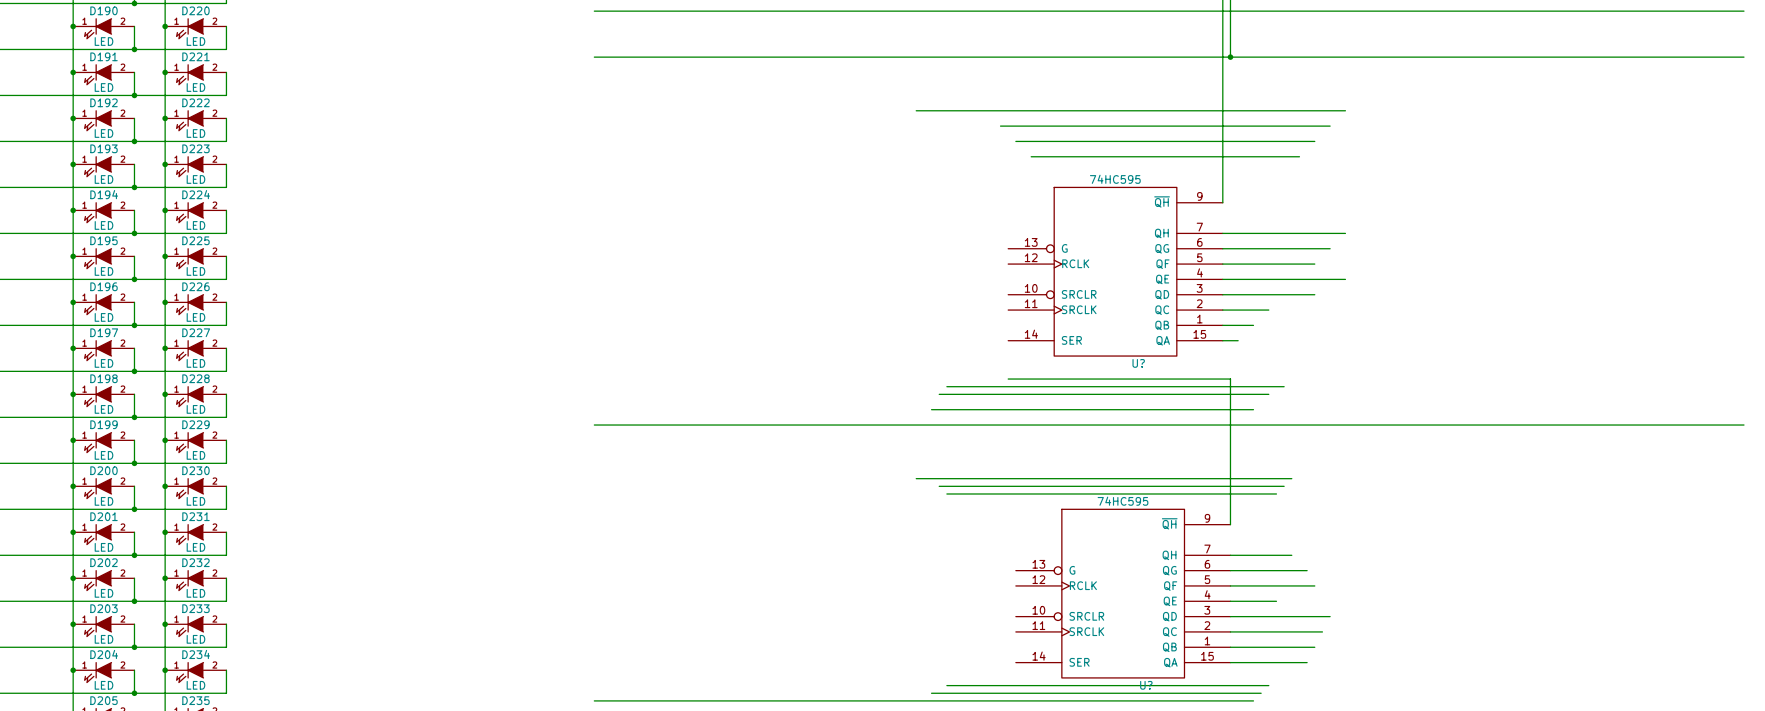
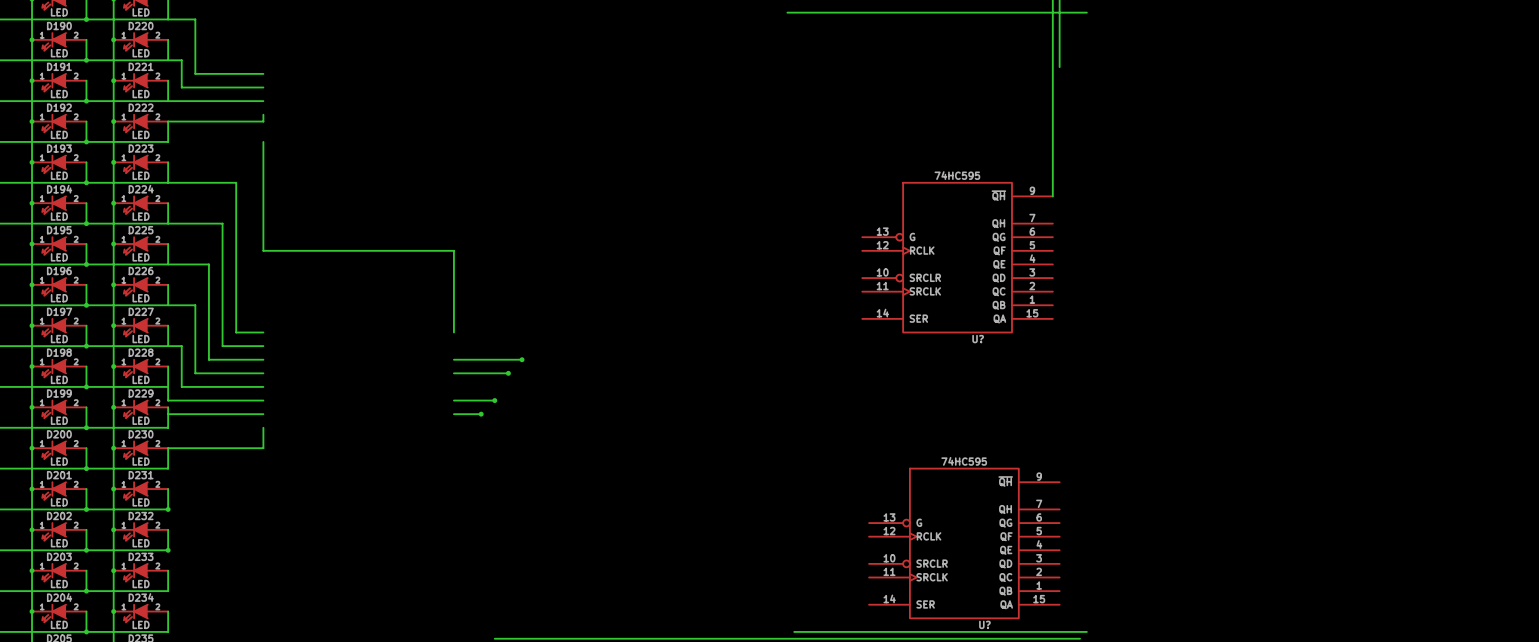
wire: none -> (168, 19) (195, 19) (195, 73) (263, 73)
wire: (594, 11) (1743, 11) -> none
wire: none -> (168, 60) (181, 60) (181, 87) (263, 87)
wire: (594, 57) (1743, 57) -> none
junction: (1230, 57) -> none
wire: none -> (168, 101) (263, 101)
wire: none -> (263, 114) (263, 121) (168, 121)
wire: (916, 110) (1345, 110) -> none
wire: (1000, 126) (1330, 126) -> none
wire: none -> (263, 141) (263, 250) (453, 250) (453, 332)
wire: (1015, 141) (1314, 141) -> none
wire: (1031, 156) (1299, 156) -> none
wire: none -> (168, 182) (236, 182) (236, 332) (263, 332)
wire: none -> (168, 223) (222, 223) (222, 346) (263, 346)
wire: (1222, 233) (1345, 233) -> none
wire: (1222, 248) (1330, 248) -> none
wire: (1222, 264) (1314, 264) -> none
wire: none -> (168, 264) (208, 264) (208, 359) (263, 359)
wire: (1222, 279) (1345, 279) -> none
wire: (1222, 294) (1314, 294) -> none
wire: (1222, 310) (1268, 310) -> none
wire: none -> (168, 305) (195, 305) (195, 373) (263, 373)
wire: (1222, 325) (1253, 325) -> none
wire: (1222, 340) (1238, 340) -> none
wire: none -> (168, 346) (181, 346) (181, 386) (263, 386)
wire: (1008, 379) (1230, 379) (1230, 524) -> none
wire: none -> (453, 359) (522, 359)
junction: none -> (522, 359)
wire: (946, 386) (1284, 386) -> none
wire: (939, 394) (1268, 394) -> none
wire: none -> (453, 373) (508, 373)
junction: none -> (508, 373)
wire: (931, 409) (1253, 409) -> none
wire: none -> (168, 386) (168, 400) (263, 400)
wire: (594, 425) (1743, 425) -> none
wire: none -> (453, 400) (494, 400)
junction: none -> (494, 400)
wire: none -> (168, 414) (263, 414)
wire: none -> (453, 414) (481, 414)
junction: none -> (481, 414)
wire: none -> (263, 427) (263, 448) (168, 448)
wire: (916, 478) (1291, 478) -> none
wire: (939, 486) (1284, 486) -> none
wire: (946, 493) (1276, 493) -> none
junction: none -> (168, 509)
wire: (1230, 555) (1291, 555) -> none
wire: (1230, 570) (1307, 570) -> none
wire: (1230, 585) (1314, 585) -> none
junction: none -> (168, 550)
wire: (1230, 601) (1276, 601) -> none
wire: (1230, 616) (1330, 616) -> none
wire: (1230, 631) (1322, 631) -> none
wire: (1230, 647) (1314, 647) -> none
wire: (1230, 662) (1307, 662) -> none
wire: (946, 685) (1268, 685) -> none

